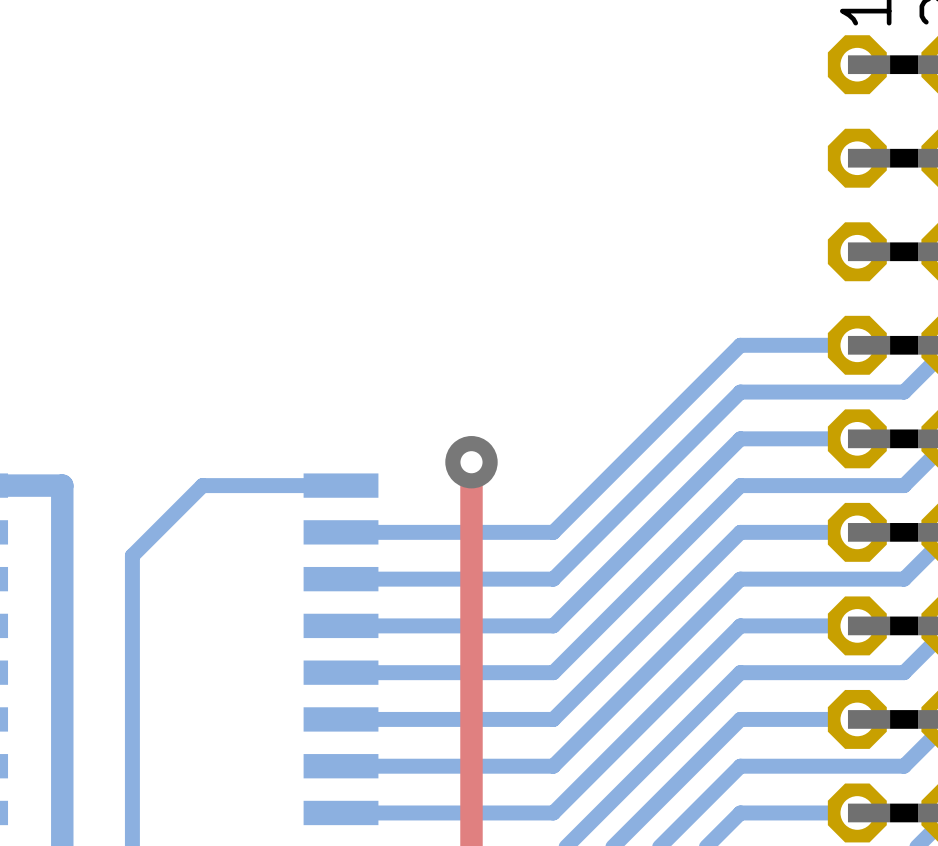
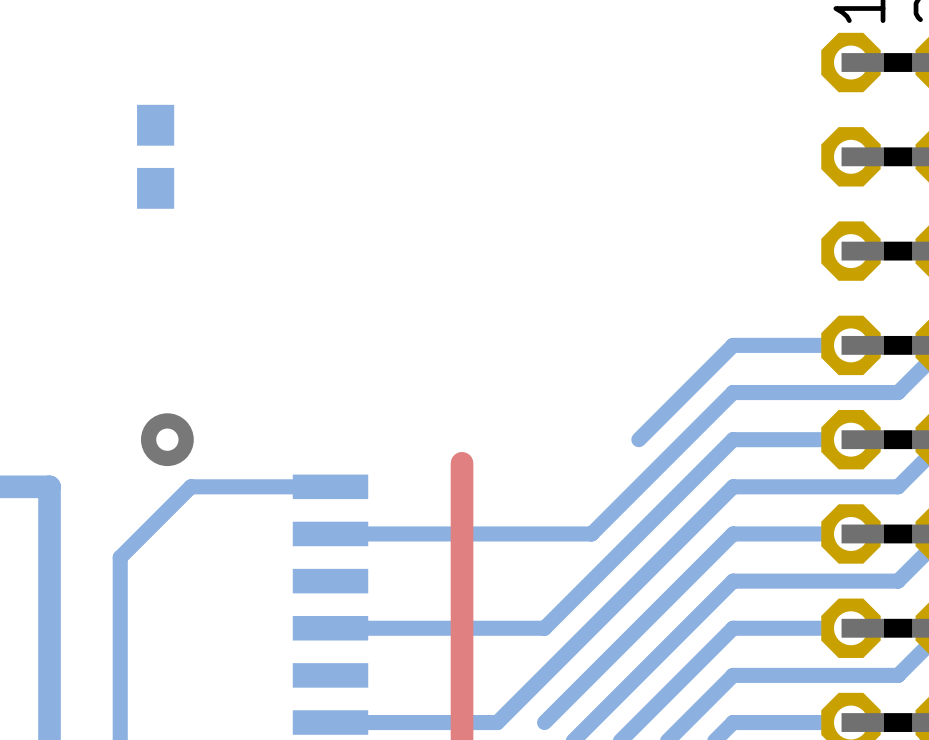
part: none -> (155, 156)
via: none -> (167, 439)
bottom track: (646, 438) (553, 532) -> (591, 533) (544, 533)
via: (471, 462) -> none
bottom track: (600, 532) (553, 579) (341, 579) -> none
bottom track: (341, 672) (553, 672) -> none
bottom track: (506, 719) (553, 719) -> (497, 722) (544, 675)

